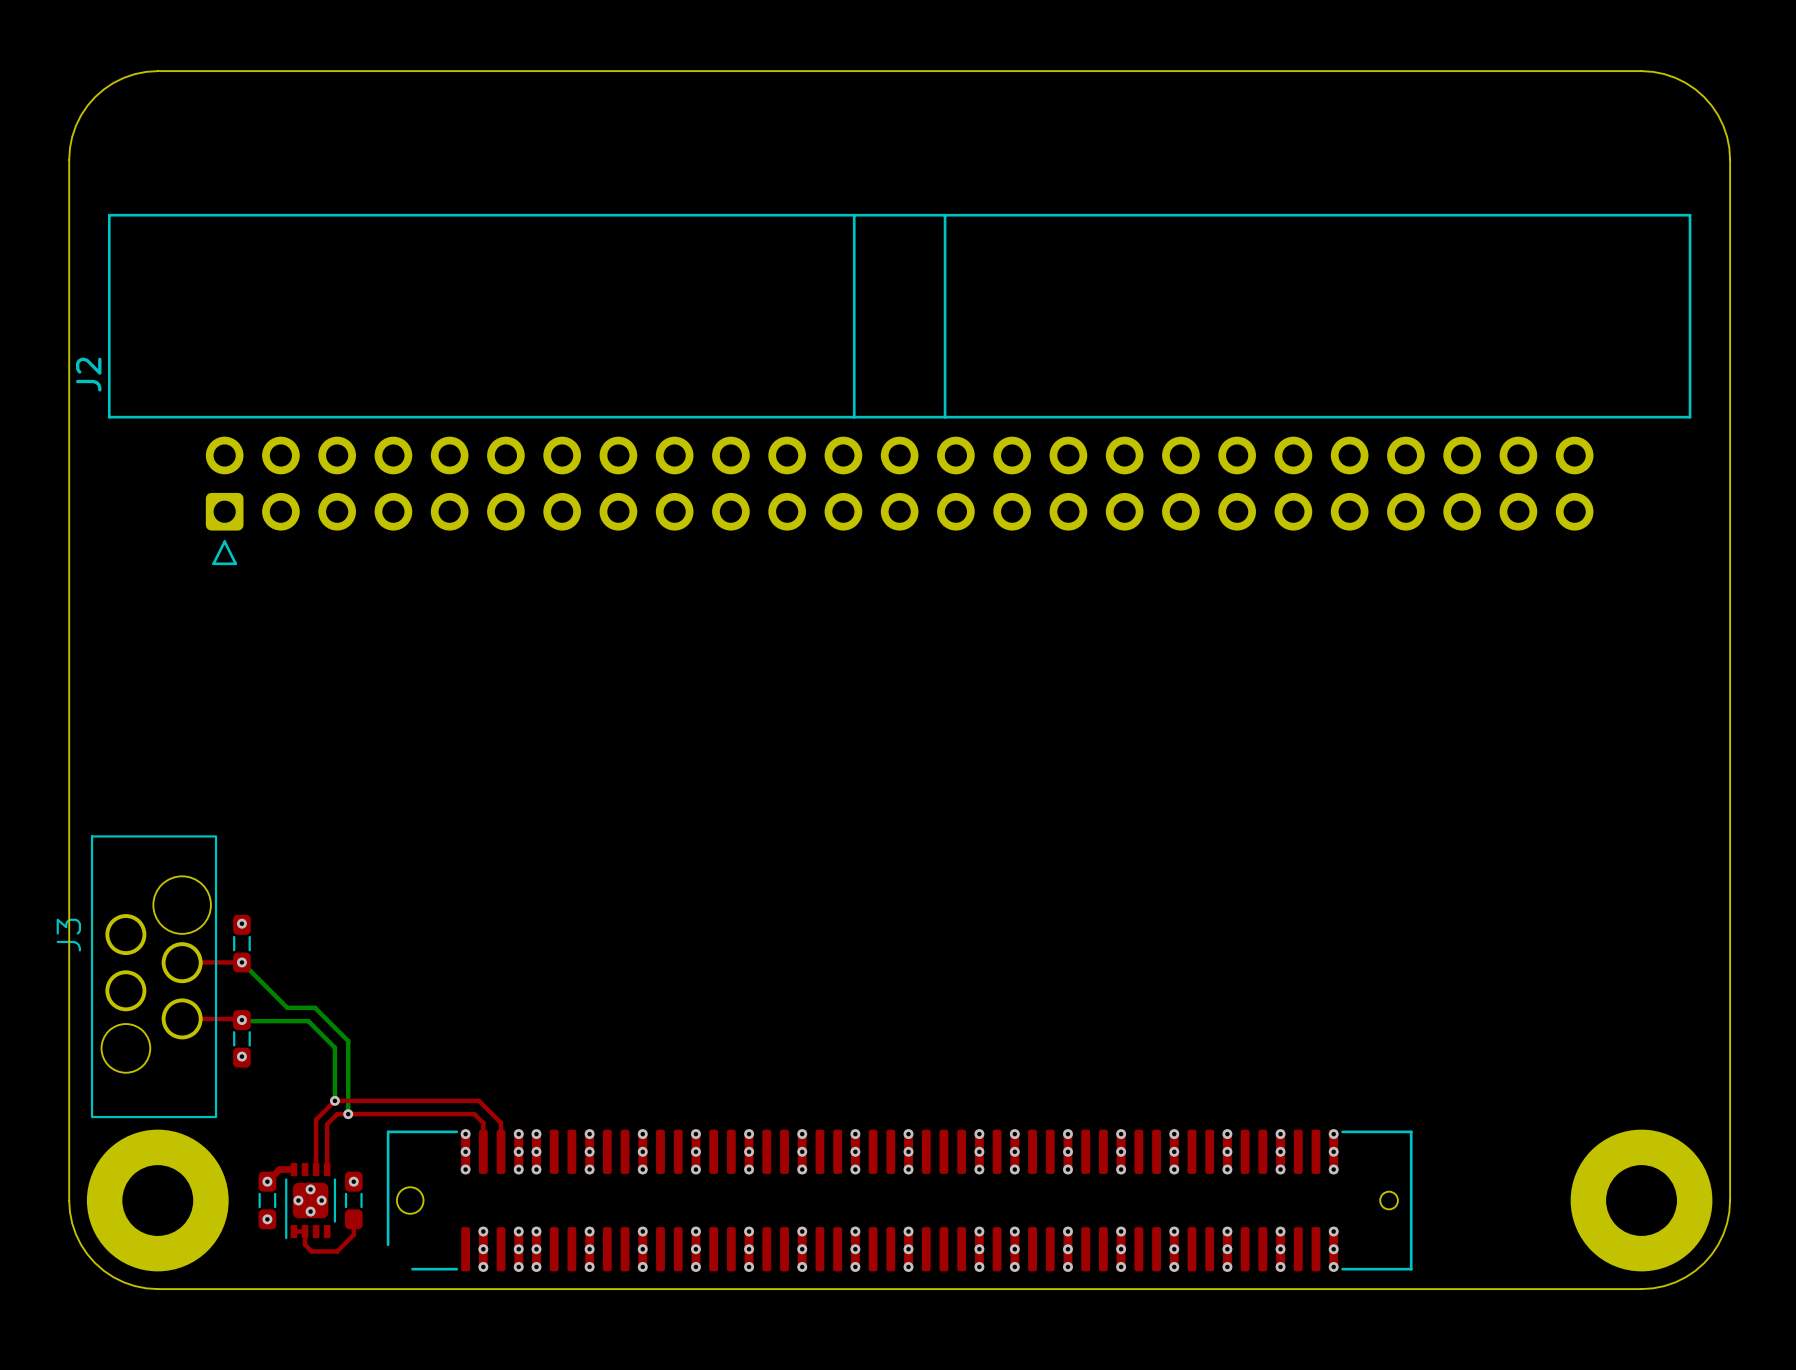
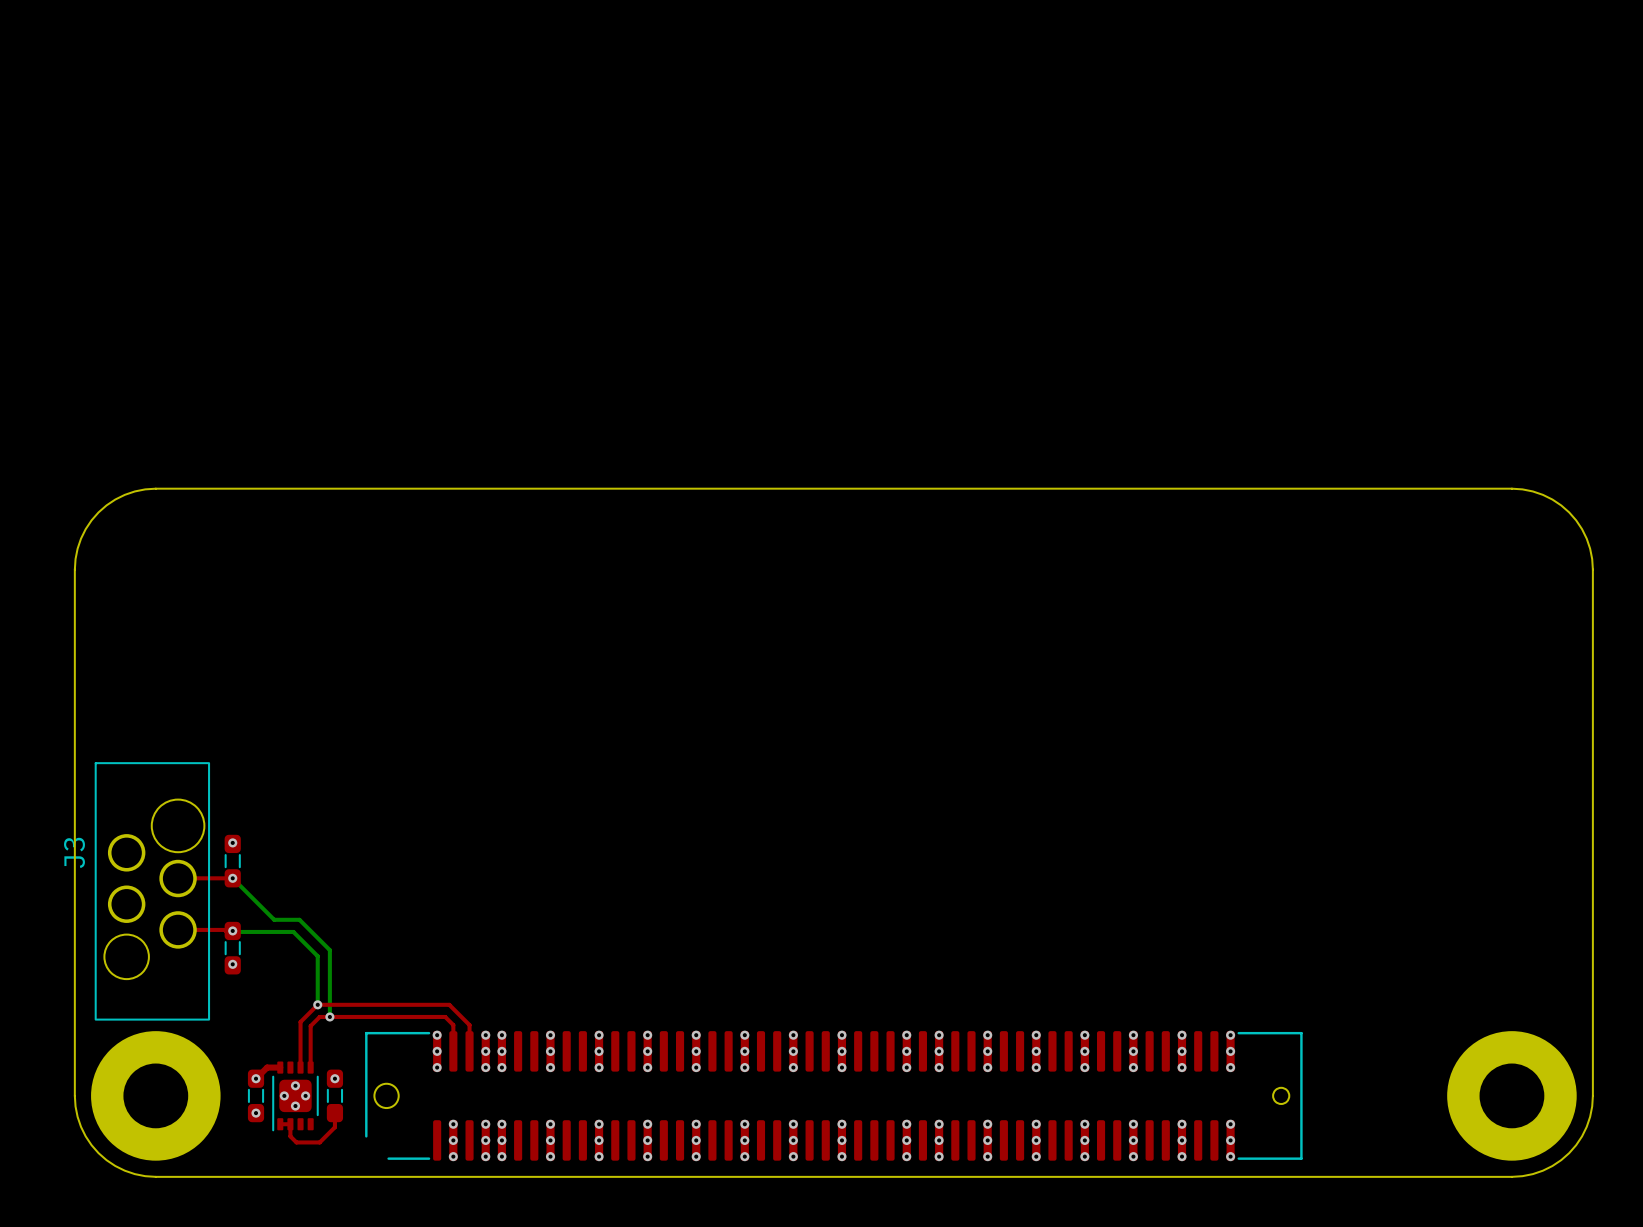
J2: (899, 389) -> none
board edge: (69, 624) (69, 148) (75, 125) (81, 115) (95, 97) (103, 89) (123, 77) (134, 74) (157, 71) (1641, 71) (1664, 74) (1675, 77) (1695, 89) (1711, 105) (1723, 125) (1729, 148) (1730, 624) -> (74, 569) (81, 538) (98, 512) (124, 494) (155, 488) (1511, 488) (1542, 494) (1569, 512) (1586, 538) (1592, 569)

